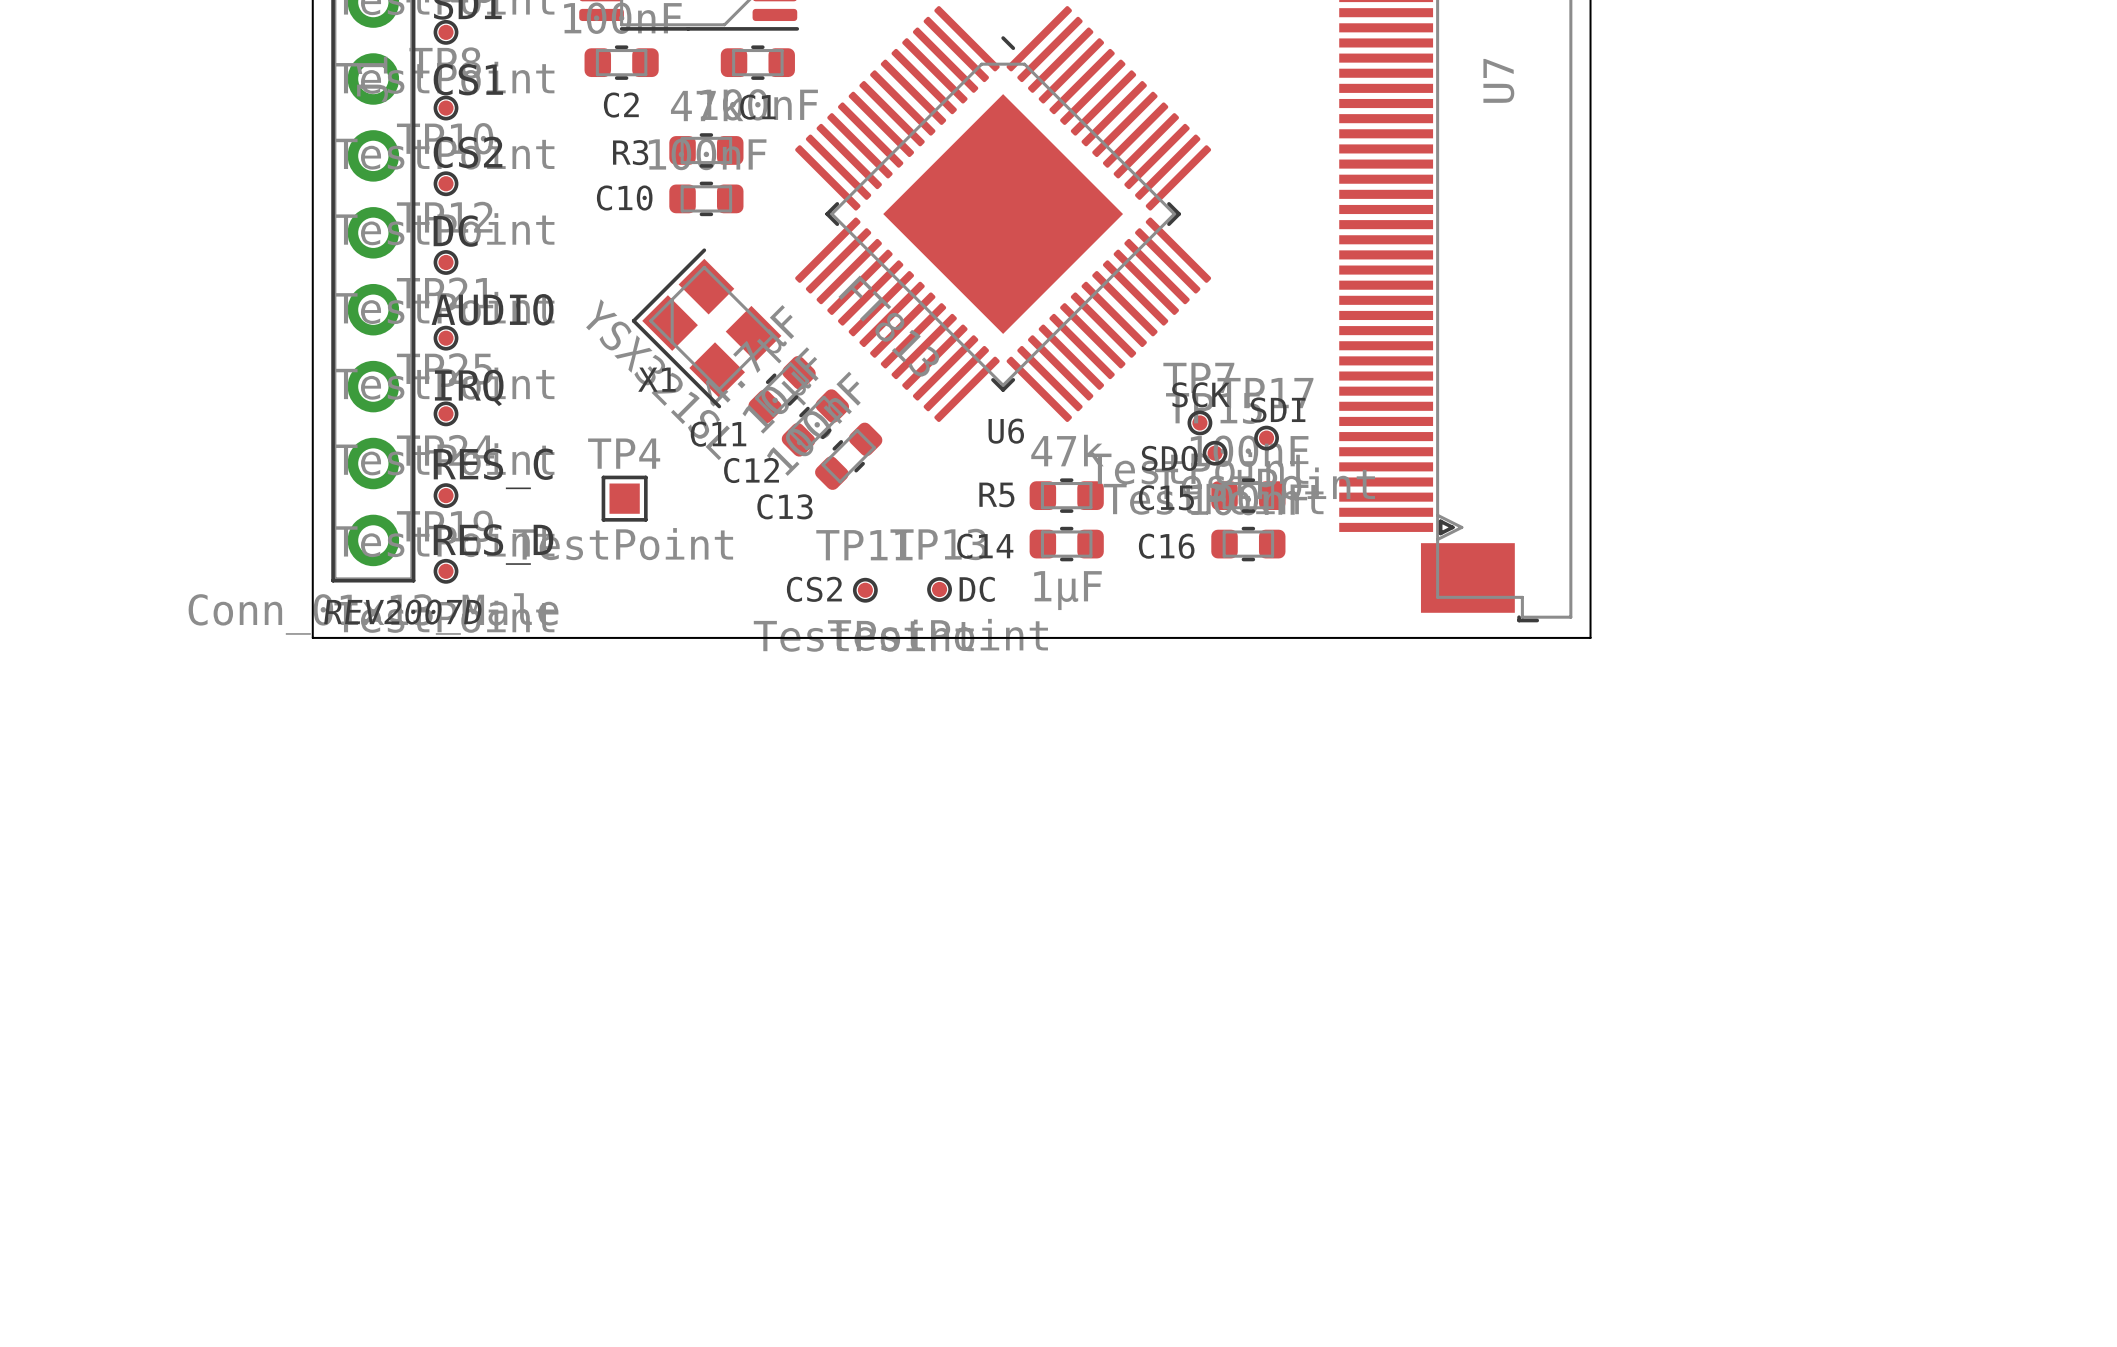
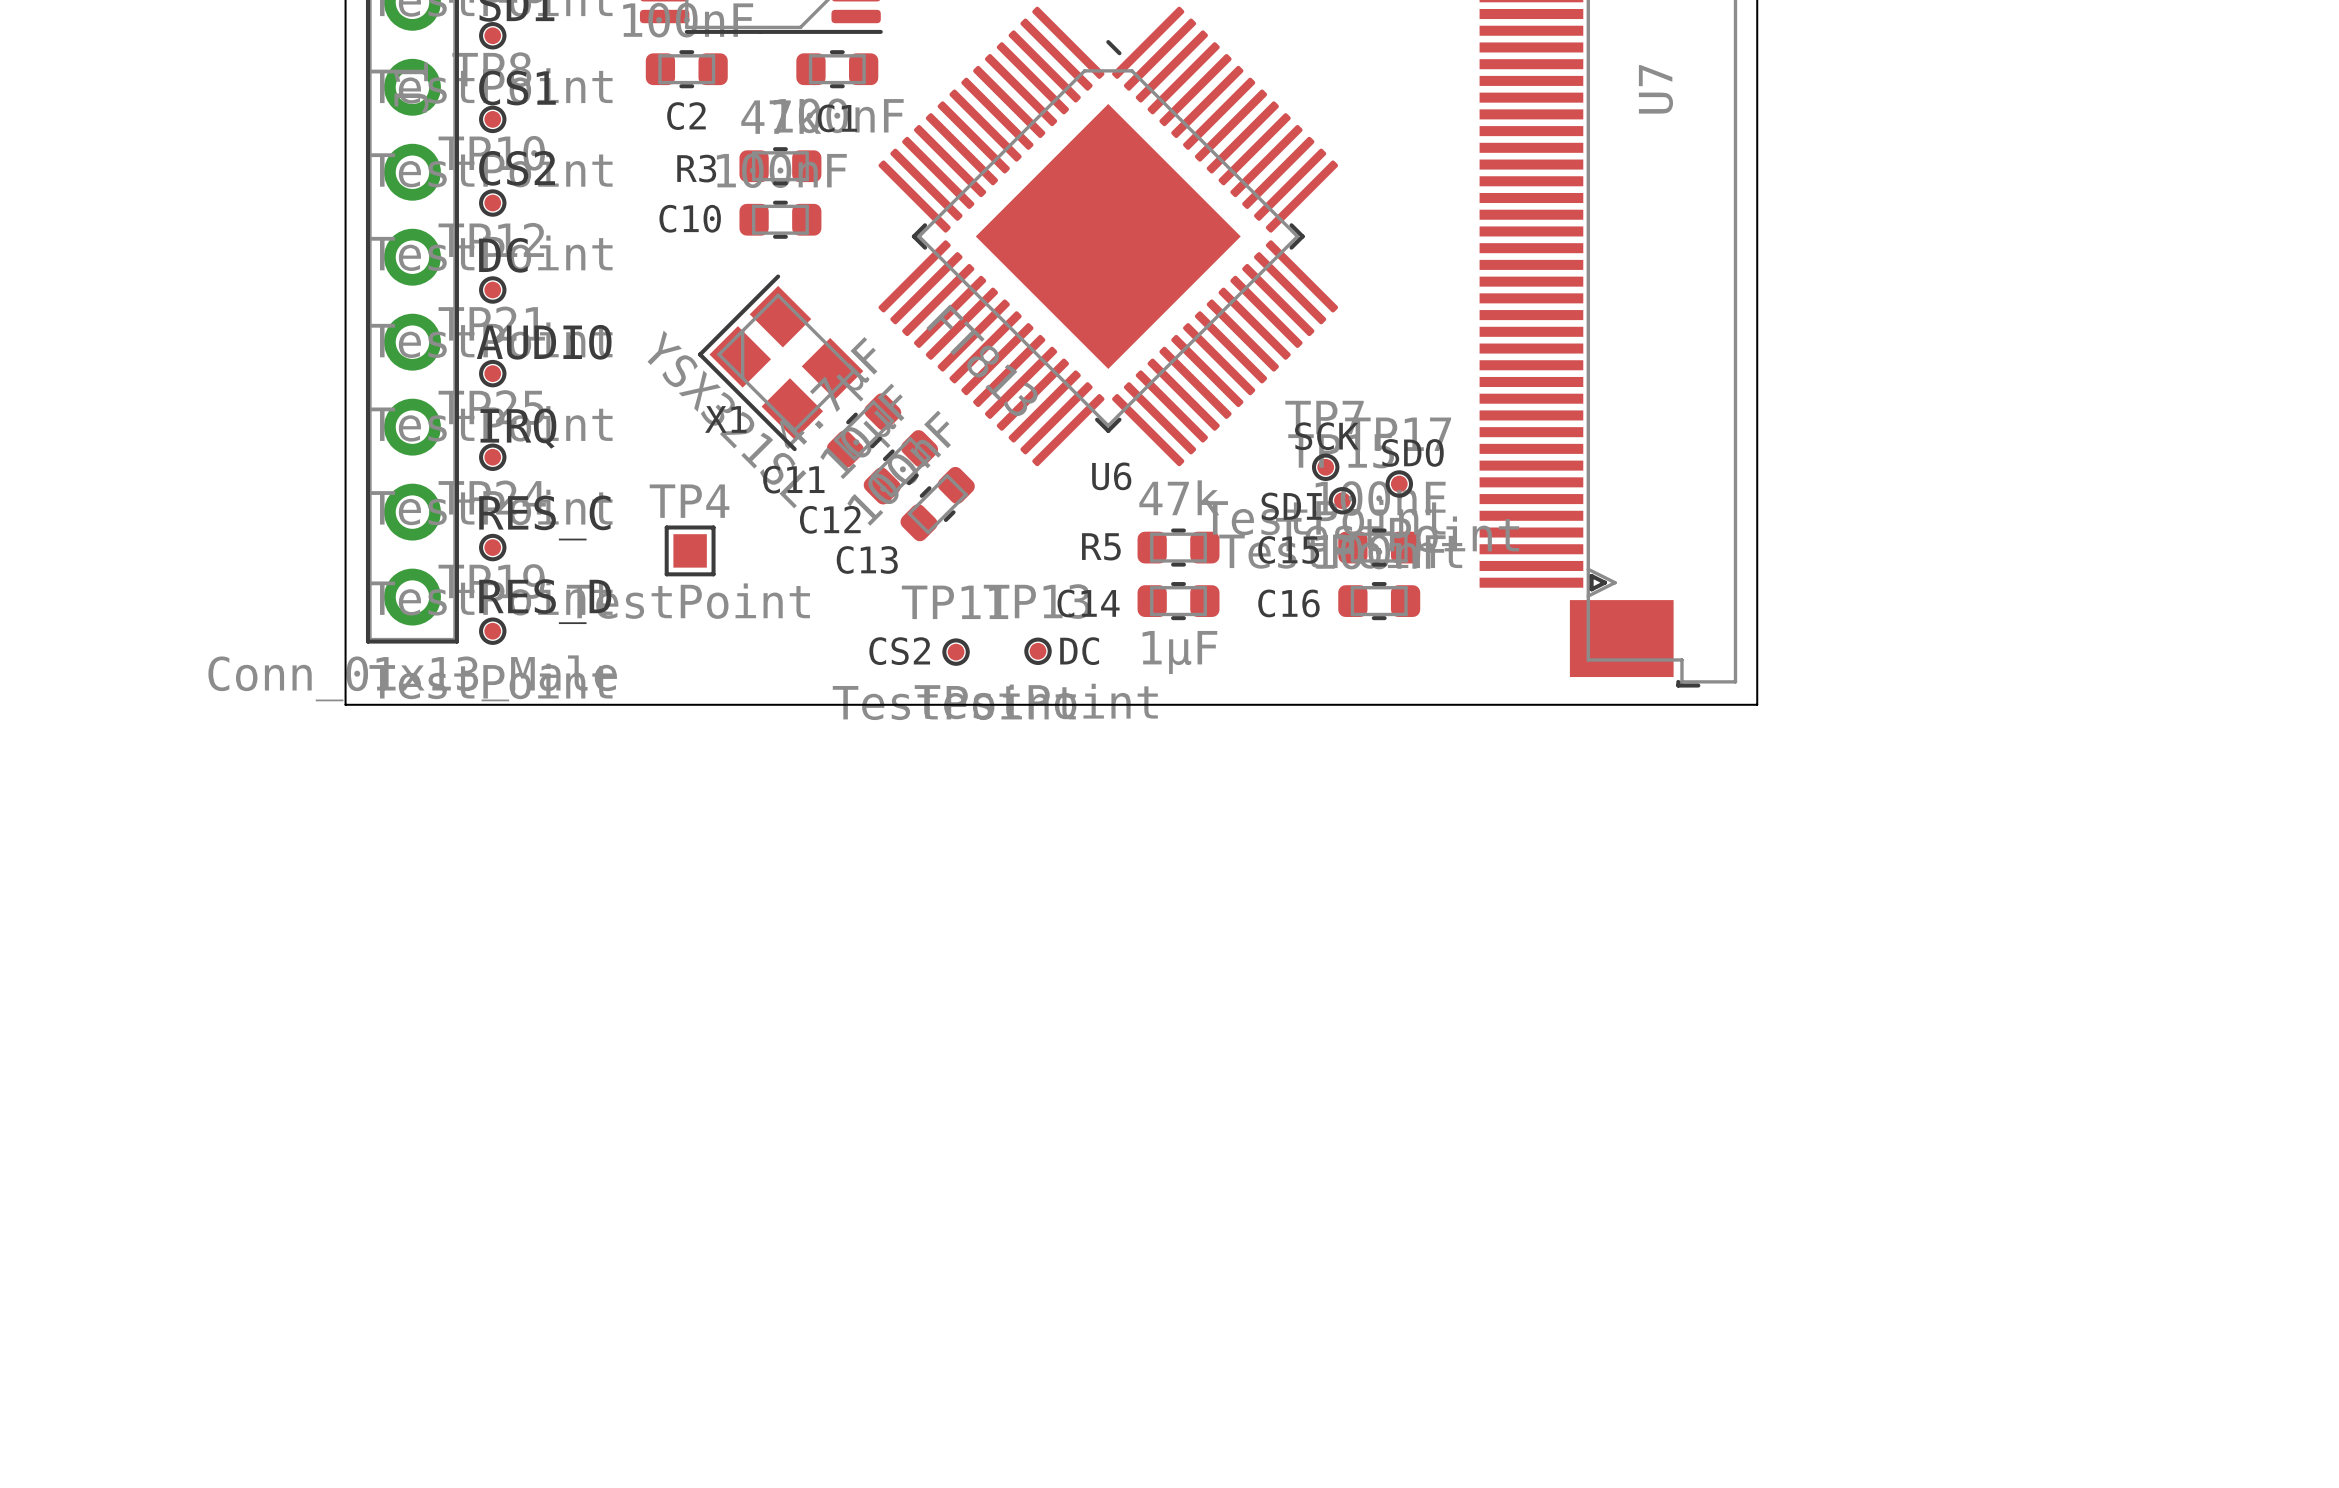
text: SDI (1278, 409) -> SDO (1412, 452)
text: SDO (1169, 458) -> SDI (1291, 506)
text: REV2007D (403, 612) -> none

